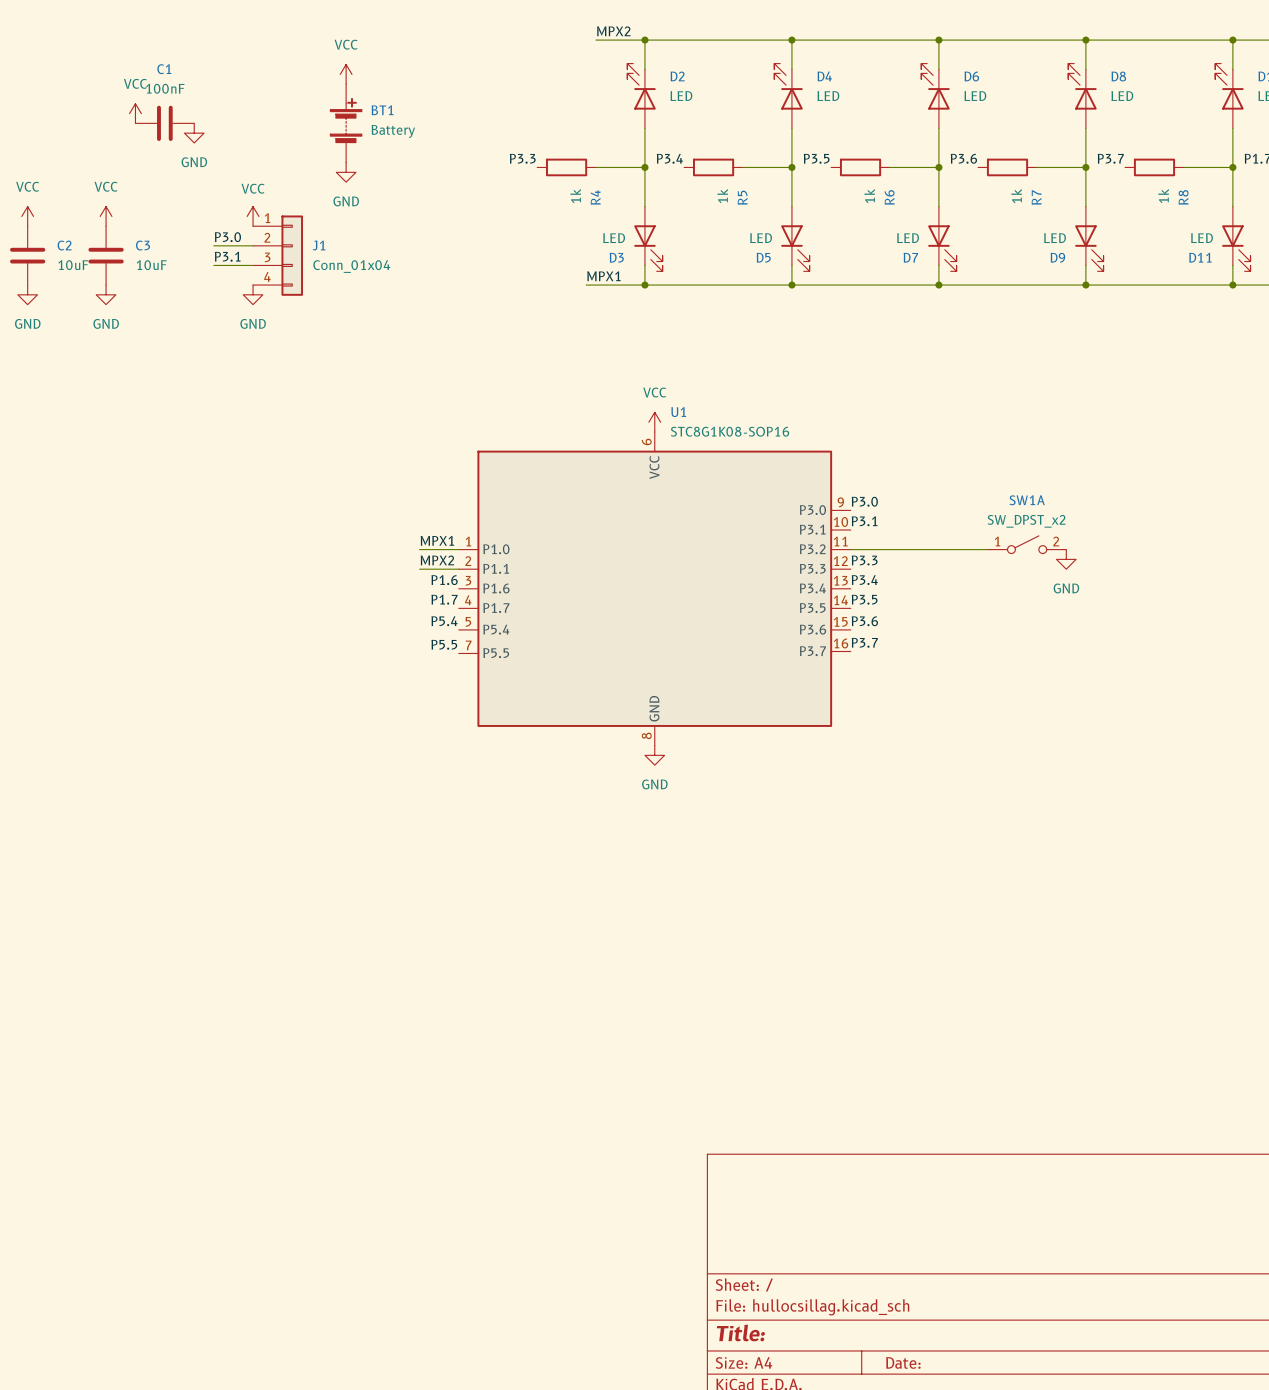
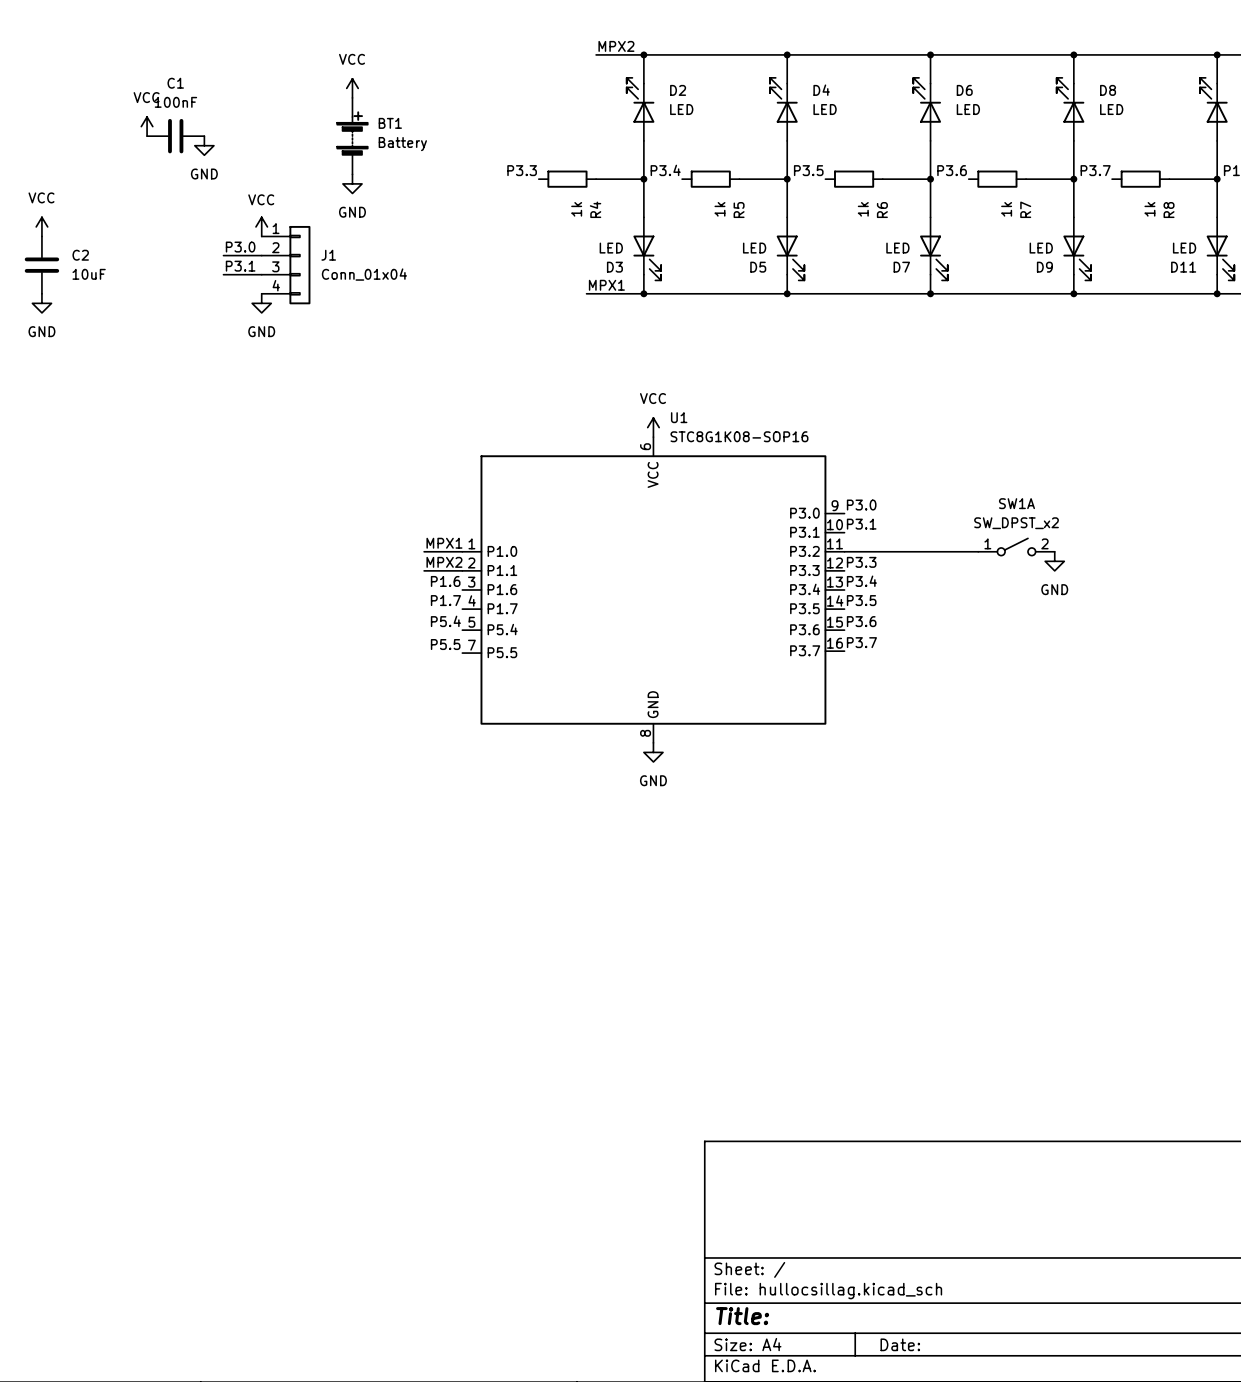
power symbol: VCC (106, 216) -> none
C3: 10uF (106, 255) -> none
power symbol: GND (106, 294) -> none

